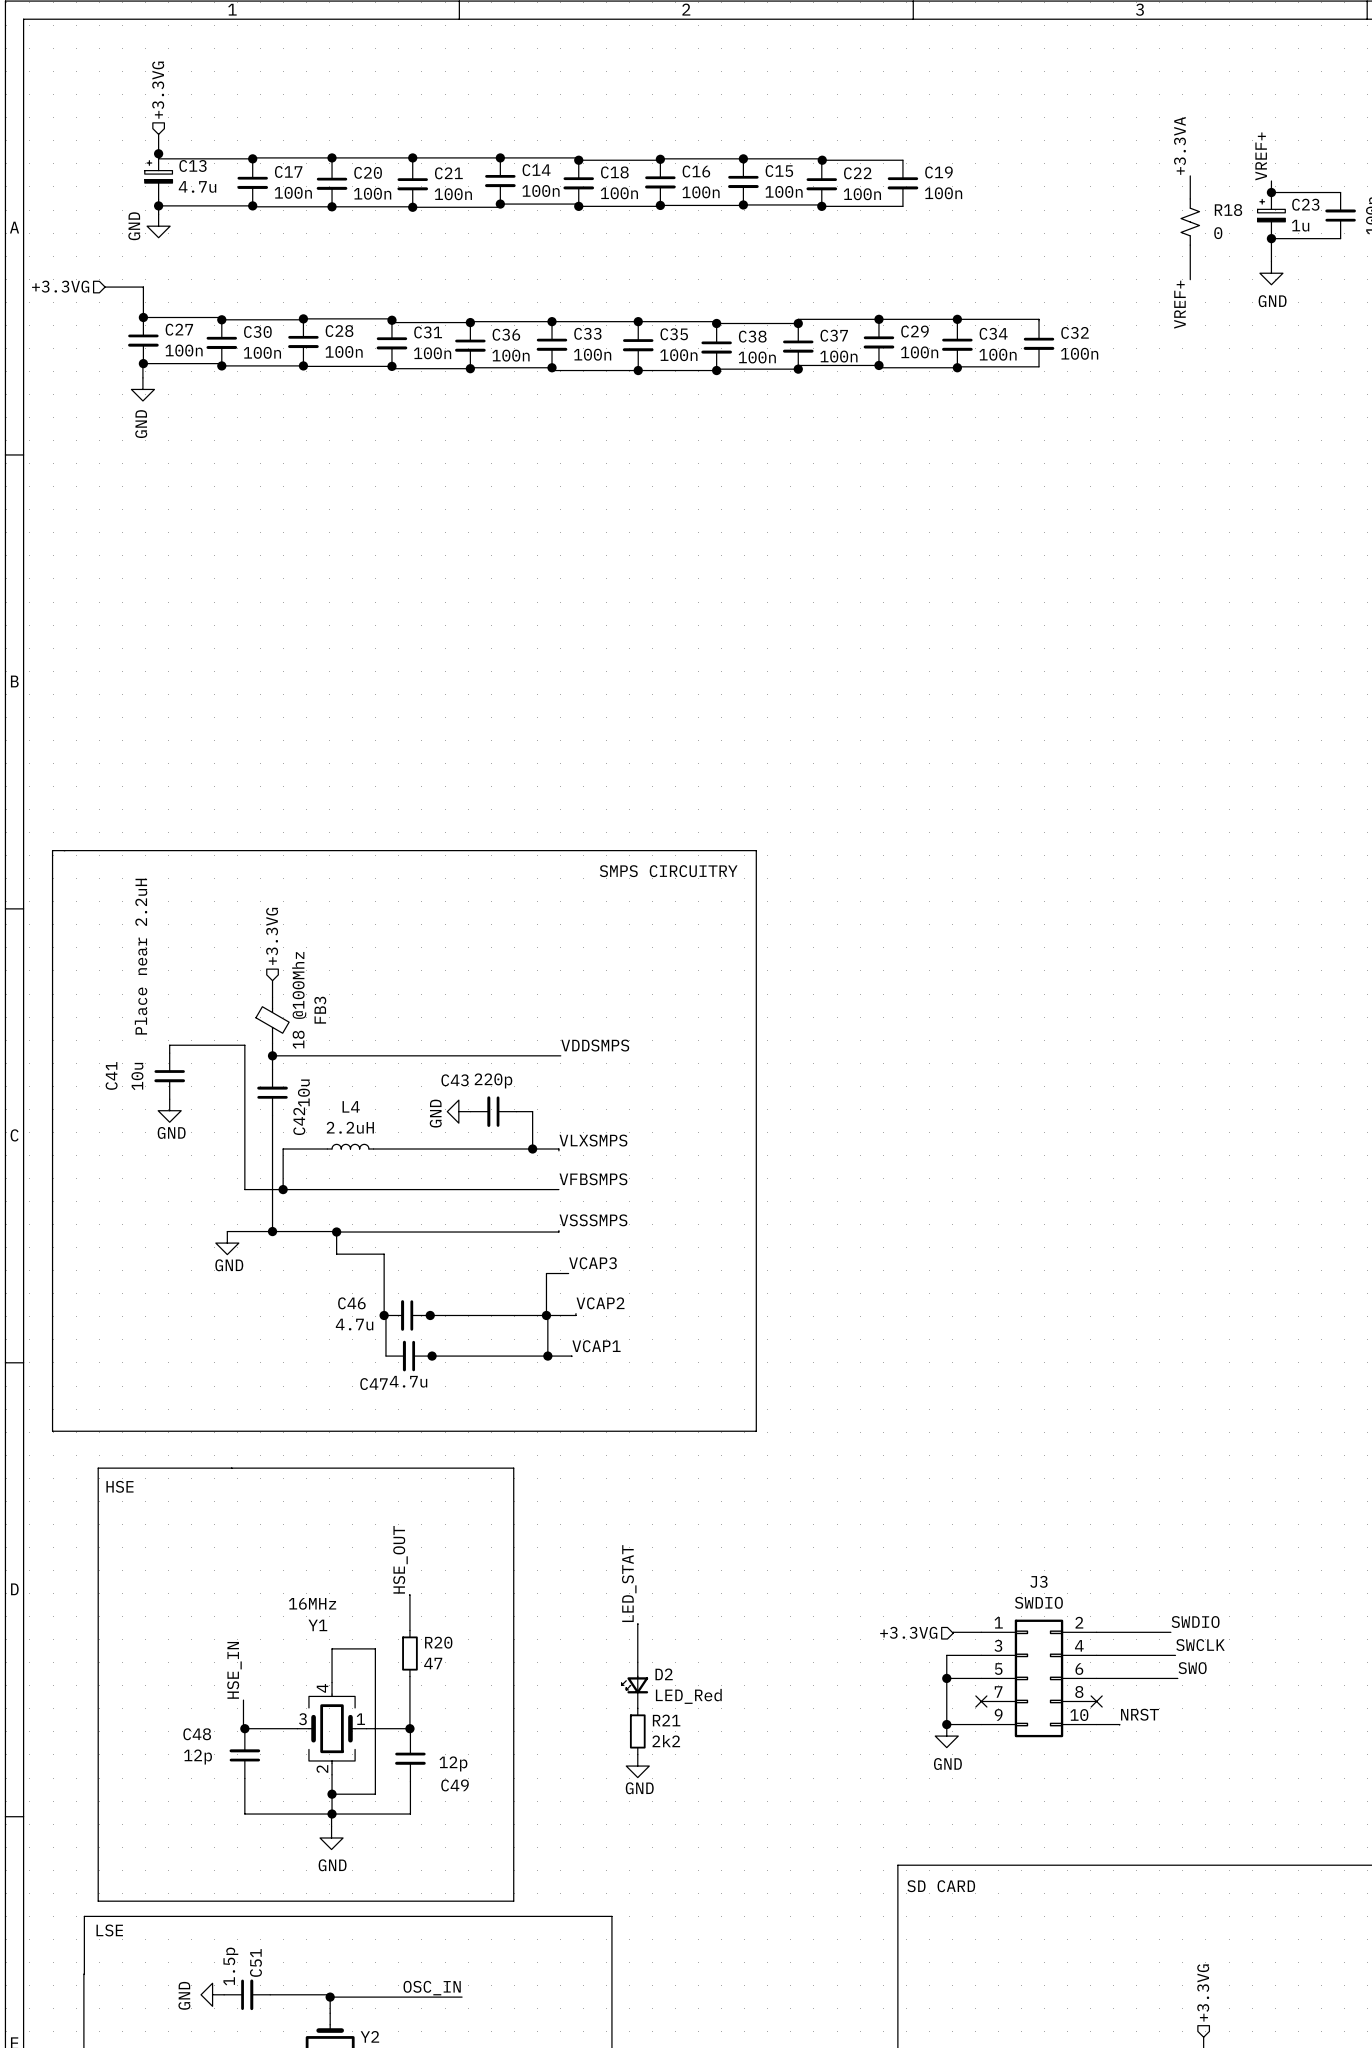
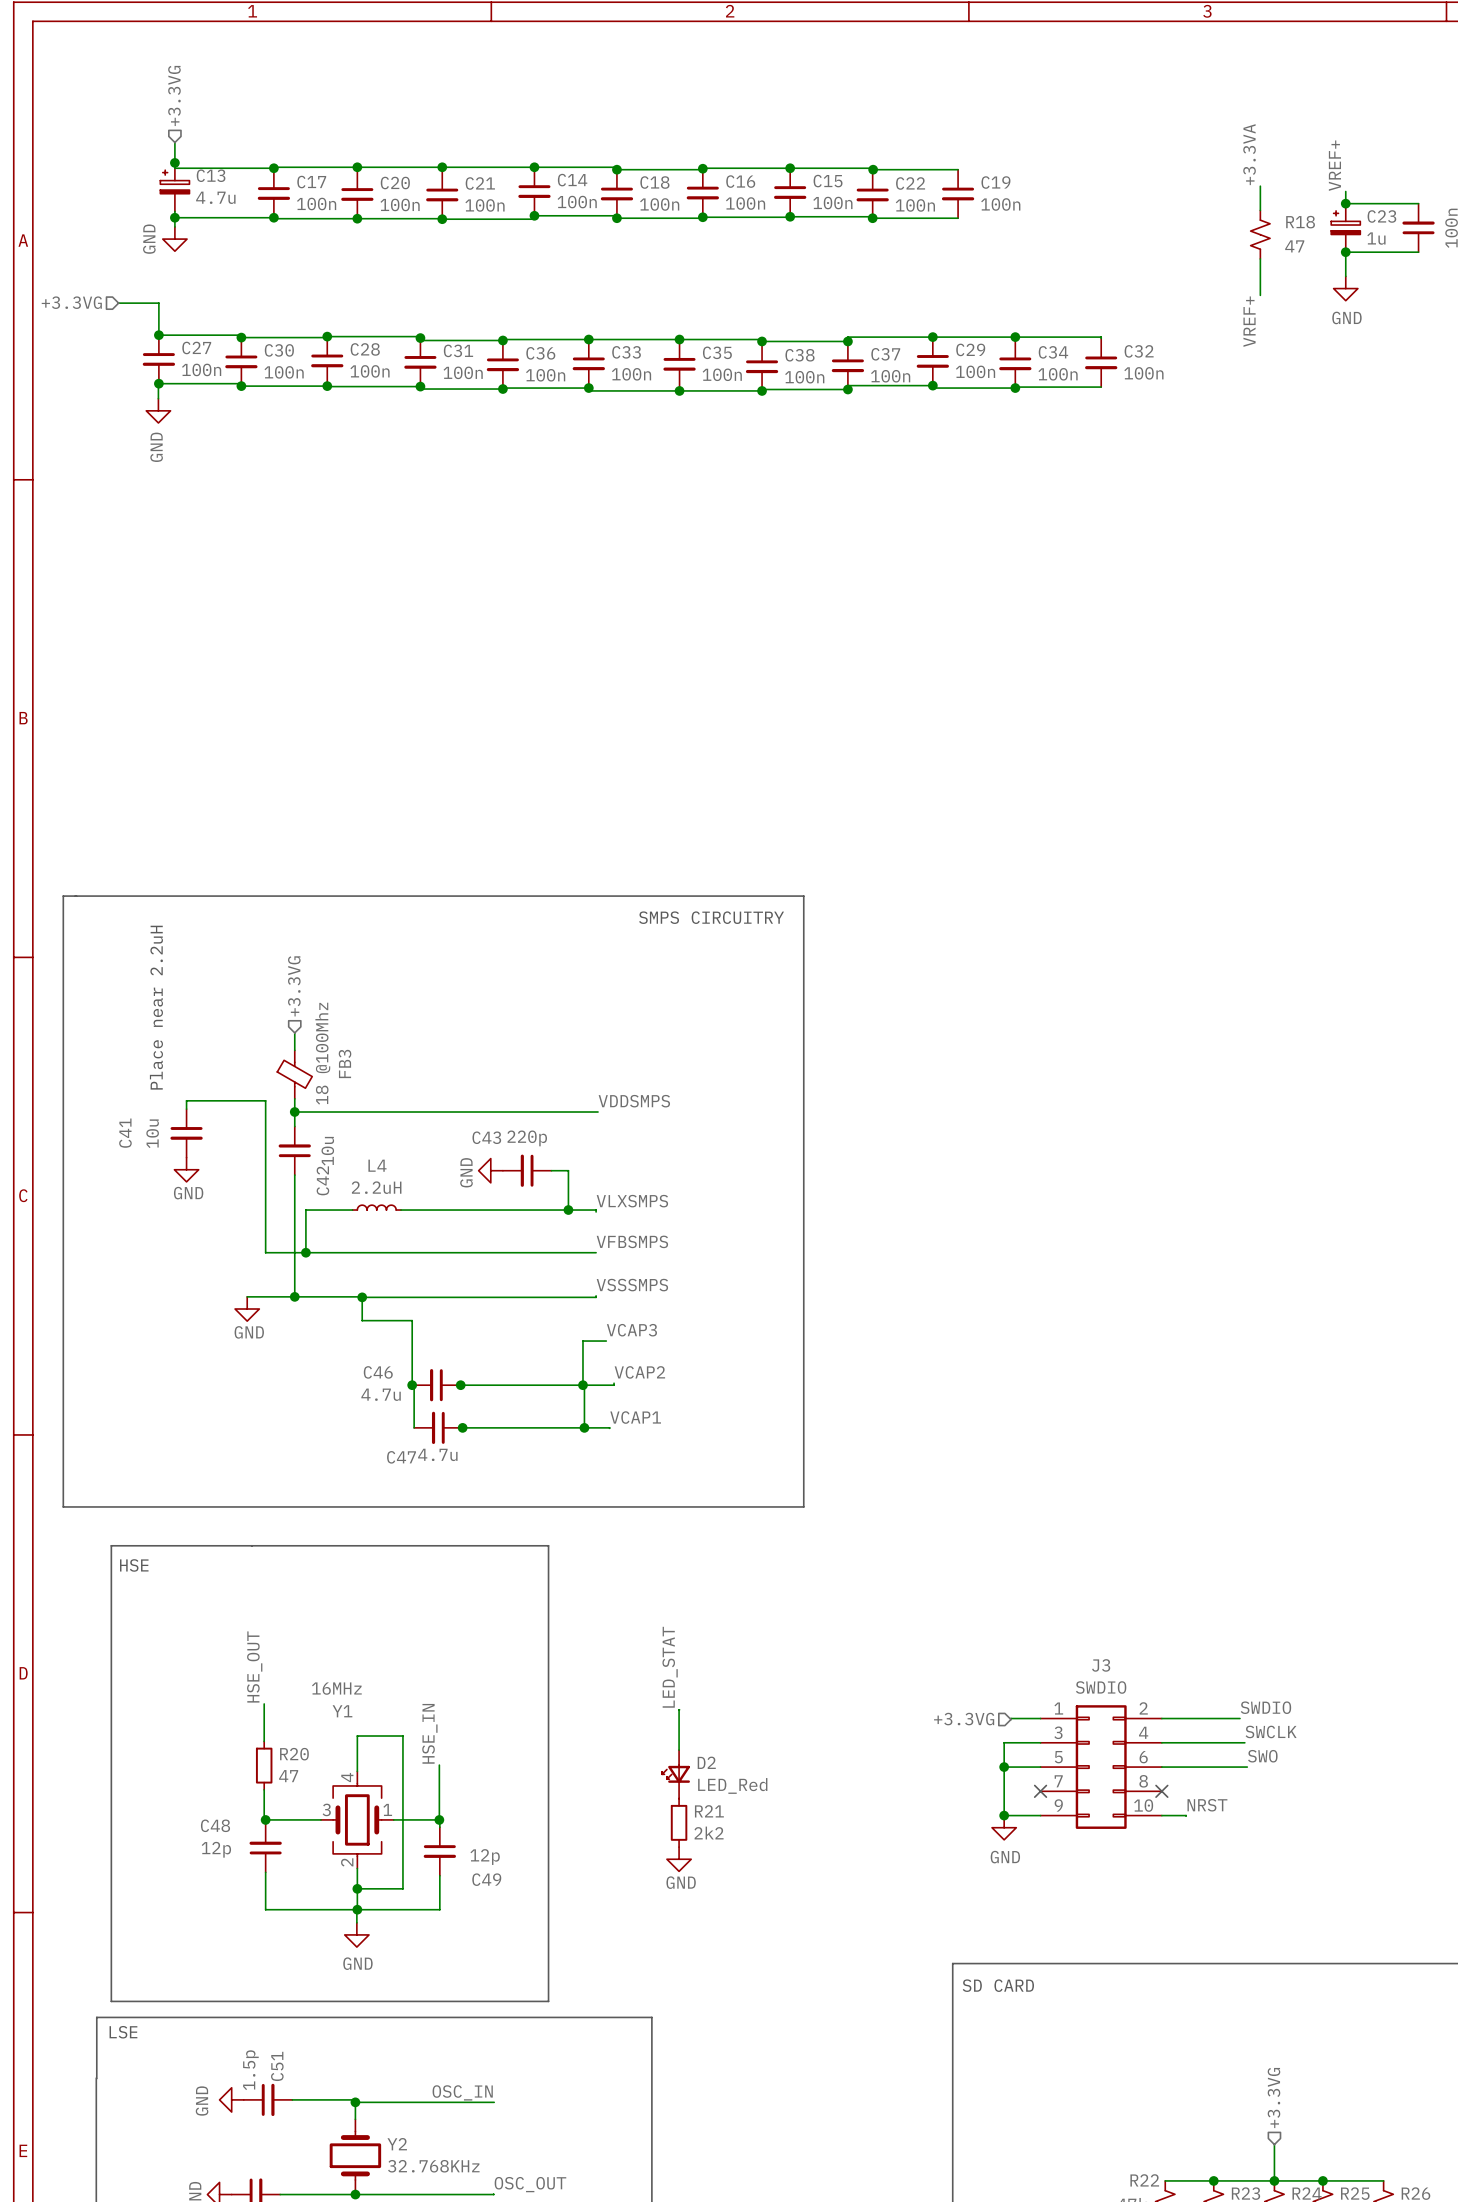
R18 value: 0 (1218, 233) -> 47 (1294, 246)
label position: HSE_OUT (400, 1559) -> HSE_OUT (254, 1667)
wire: (409, 1594) (409, 1630) -> none
wire: none -> (264, 1703) (264, 1741)
R20 position: (409, 1653) -> (264, 1765)
label position: HSE_IN (234, 1670) -> HSE_IN (429, 1733)

